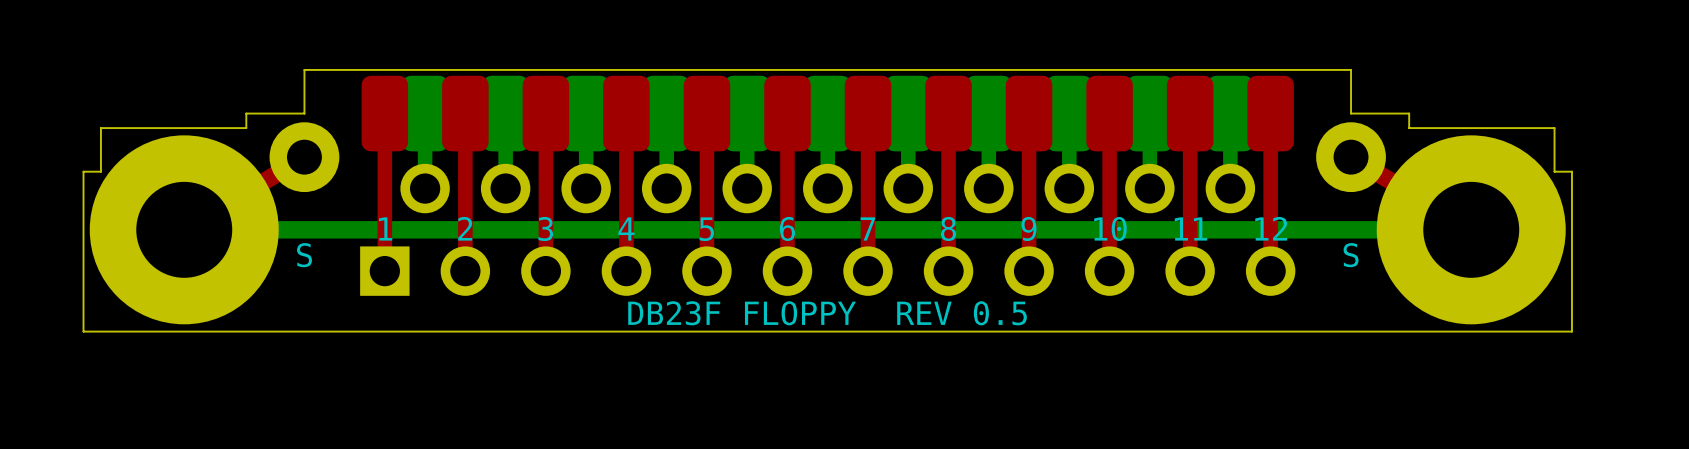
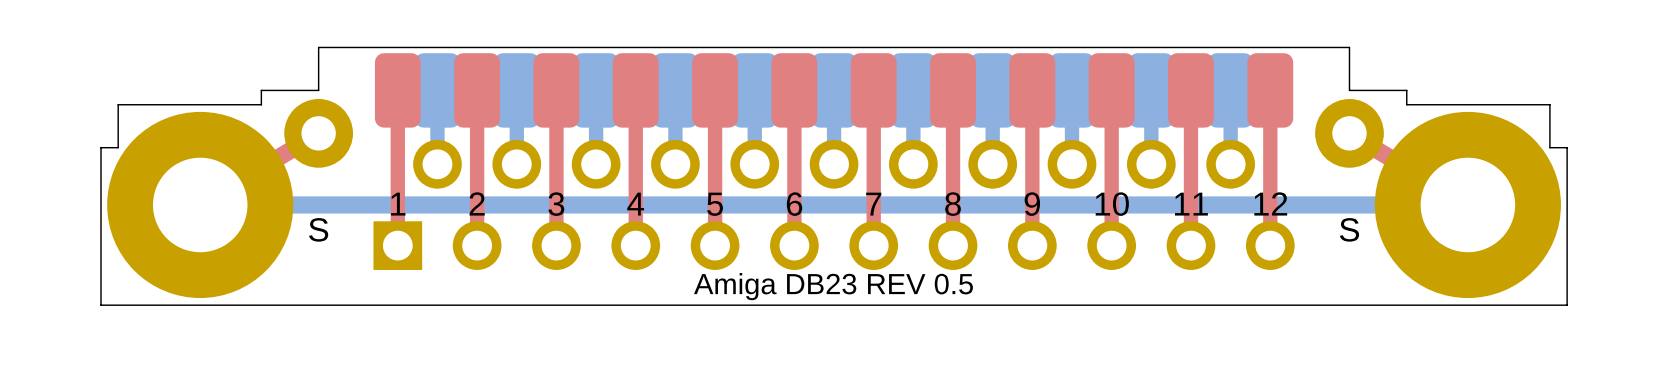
text: DB23F FLOPPY REV 0.5 (827, 313) -> Amiga DB23 REV 0.5 (833, 286)

